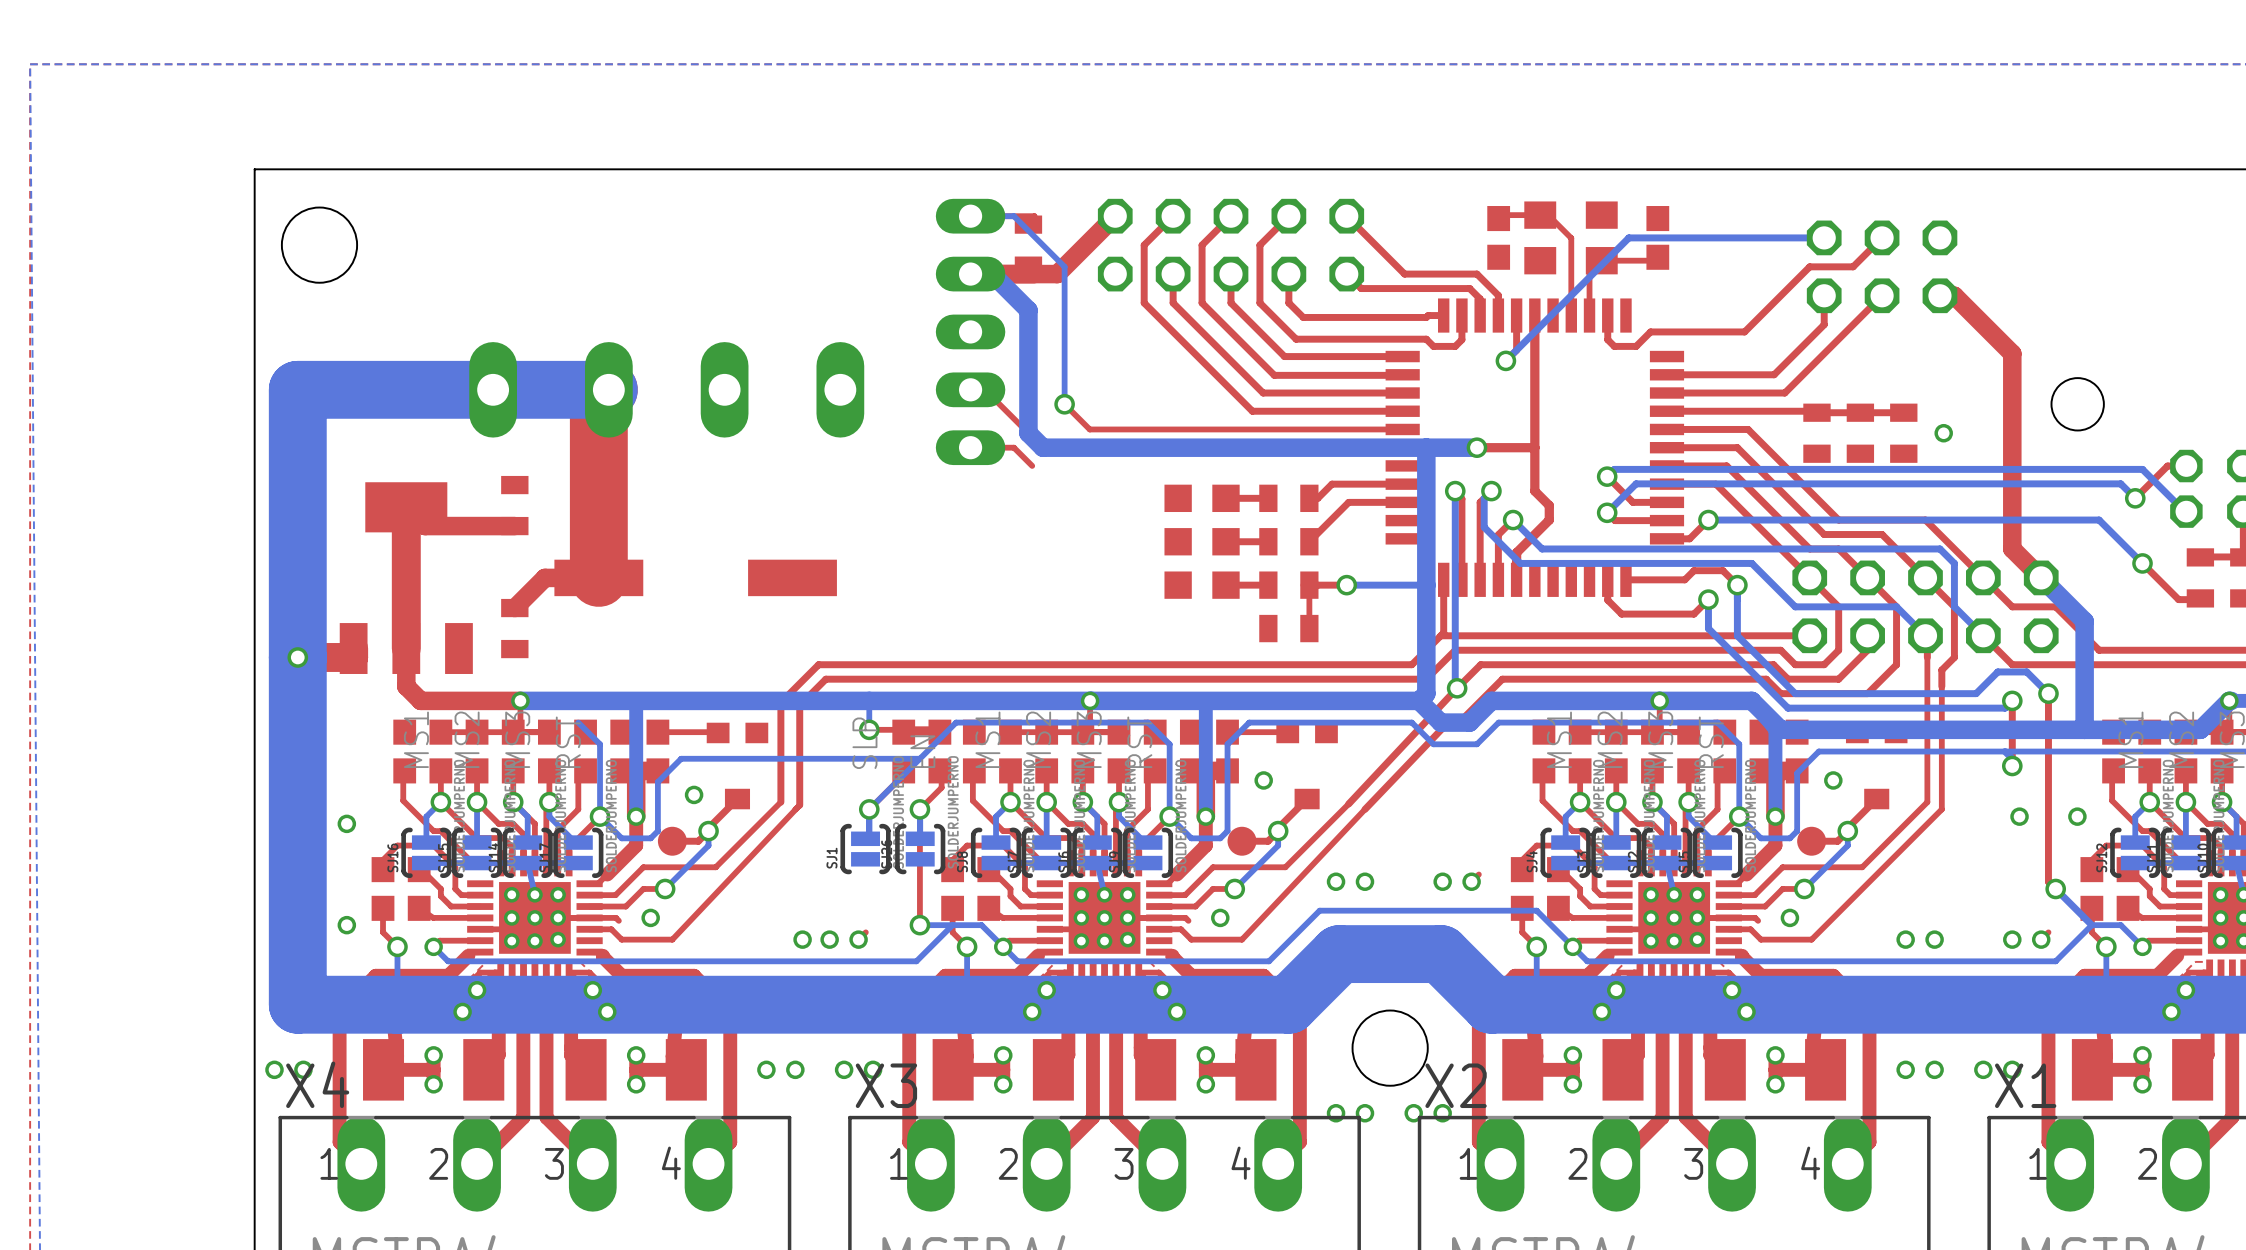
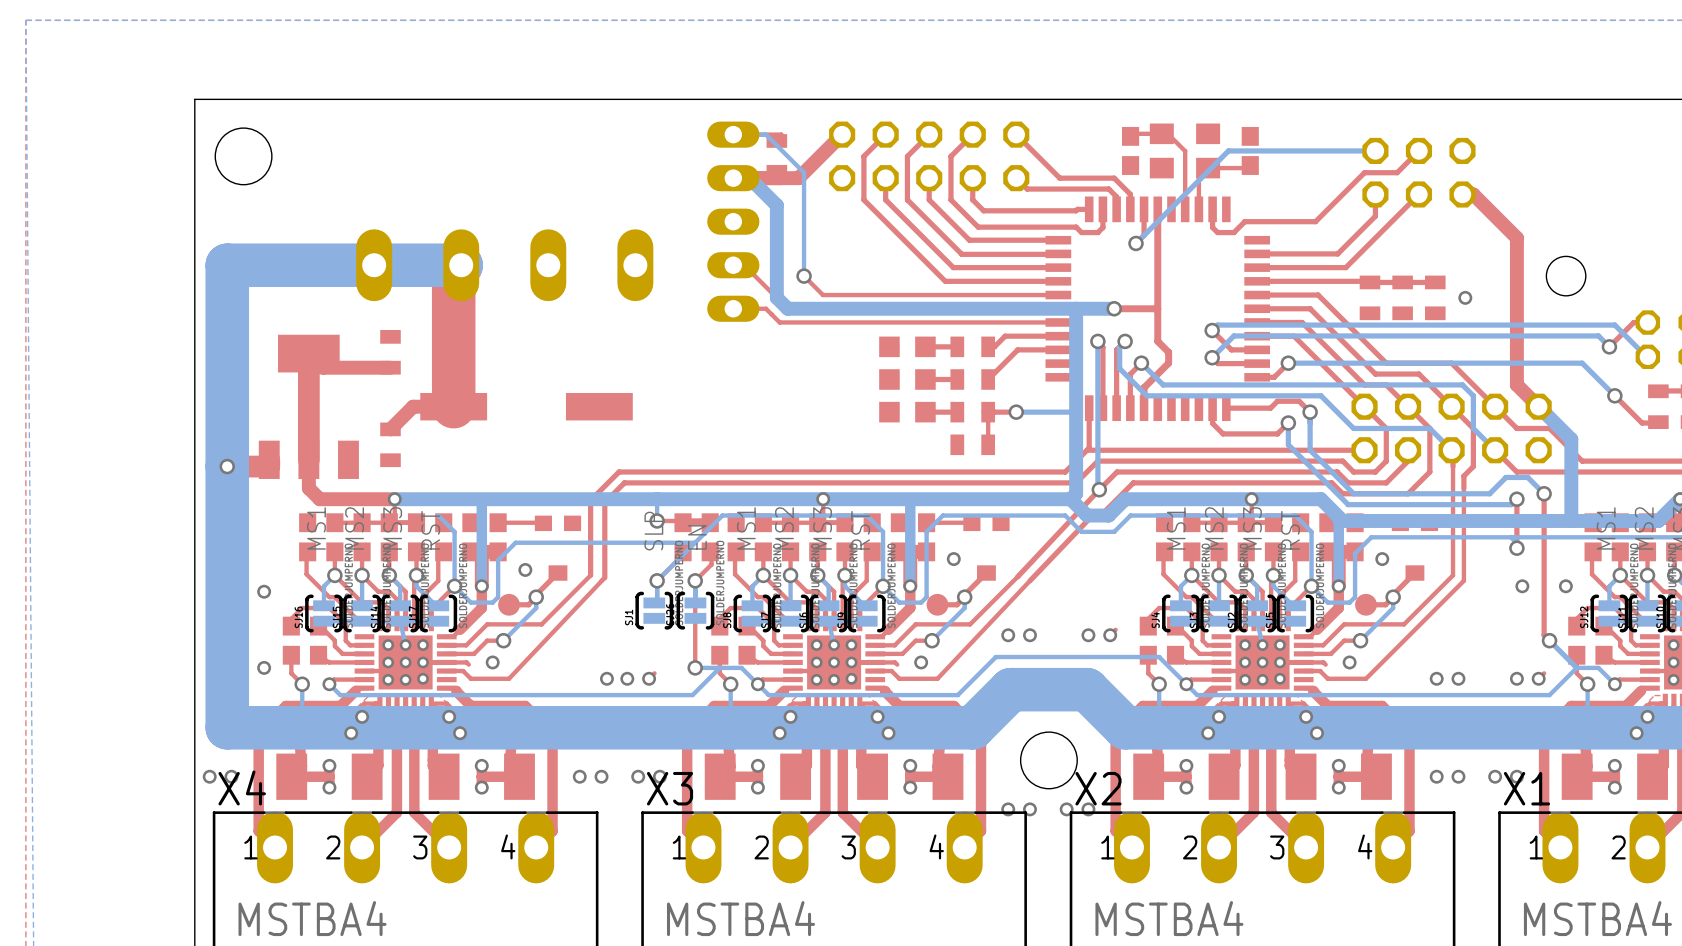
top track: none -> (1058, 322) (779, 322)

